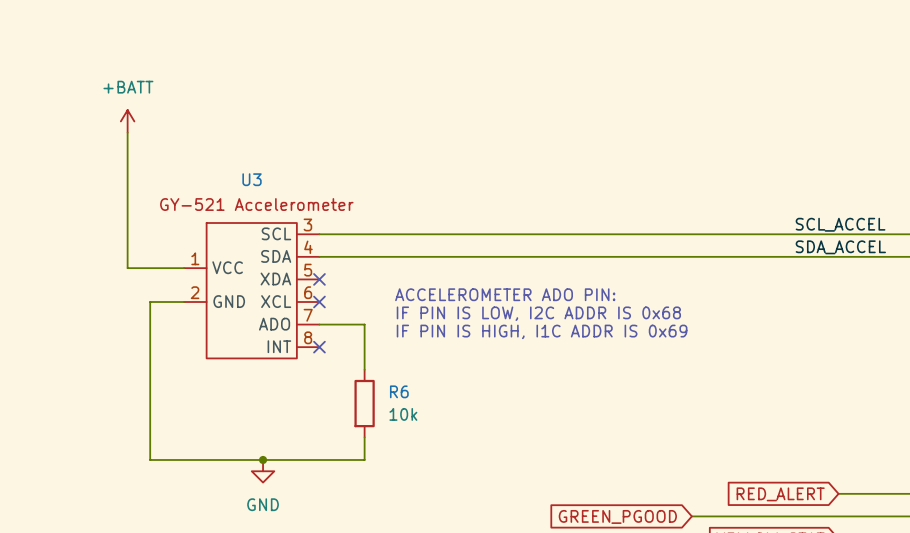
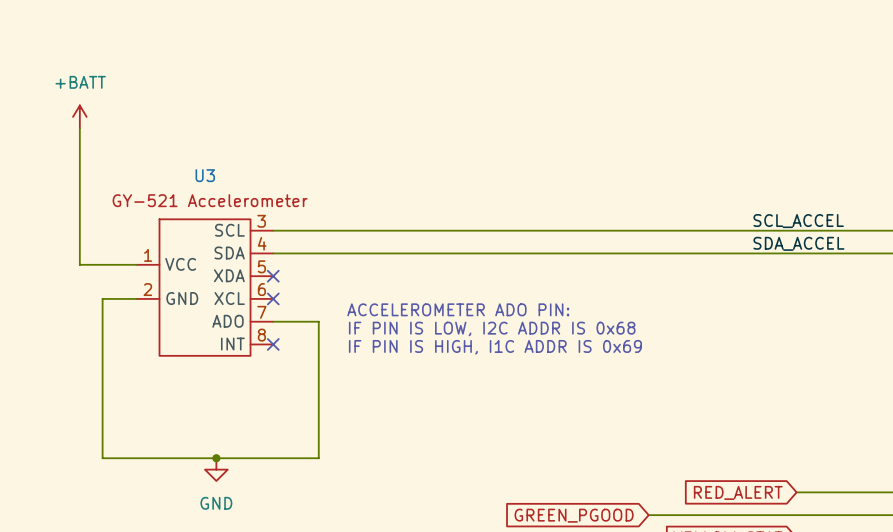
text: ACCELEROMETER ADO PIN: (505, 294) -> none
text: IF PIN IS LOW, I2C ADDR IS 0x68 (538, 313) -> ACCELEROMETER ADO PIN: (458, 309)
text: IF PIN IS HIGH, I1C ADDR IS 0x69 (542, 331) -> IF PIN IS LOW, I2C ADDR IS 0x68 (492, 328)
text: none -> IF PIN IS HIGH, I1C ADDR IS 0x69 (495, 347)
wire: none -> (318, 367) (318, 435)
R6: 10k (364, 403) -> none

